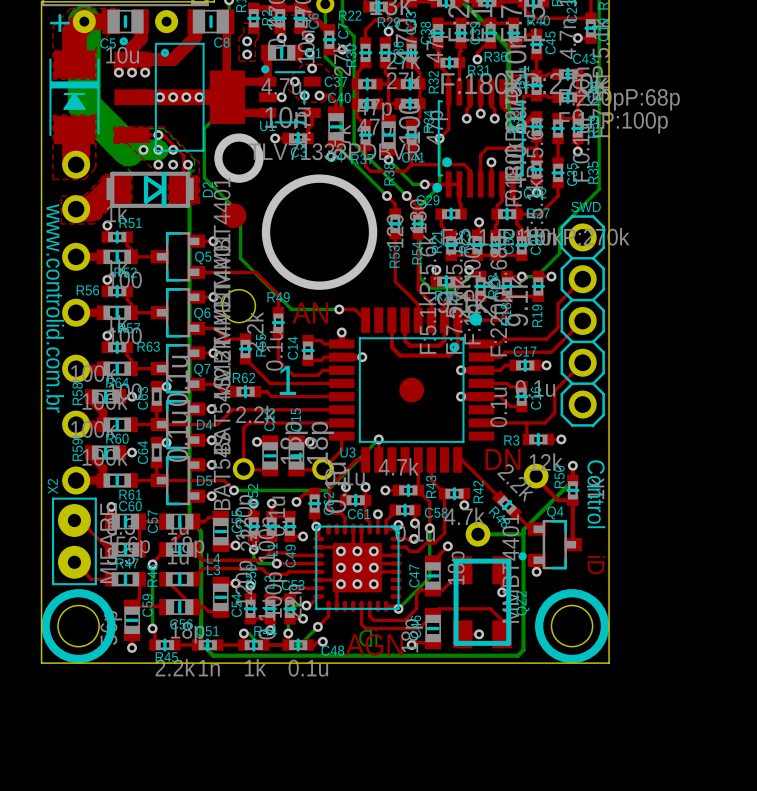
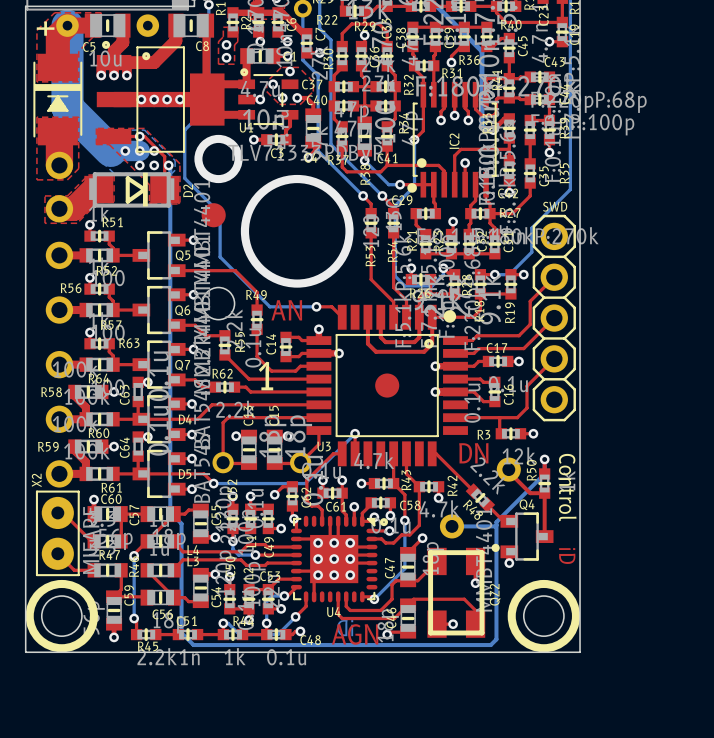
IC2 name: none -> IC2 (454, 141)
text: www.controlid.com.br (55, 308) -> none
R58 name rotation: 0° (77, 393) -> 90° clockwise (51, 392)
R59 name rotation: 0° (77, 449) -> 90° clockwise (48, 446)
drawing: none -> [379, 518, 389, 527]
part: (357, 567) -> none
U4: none -> (334, 559)

